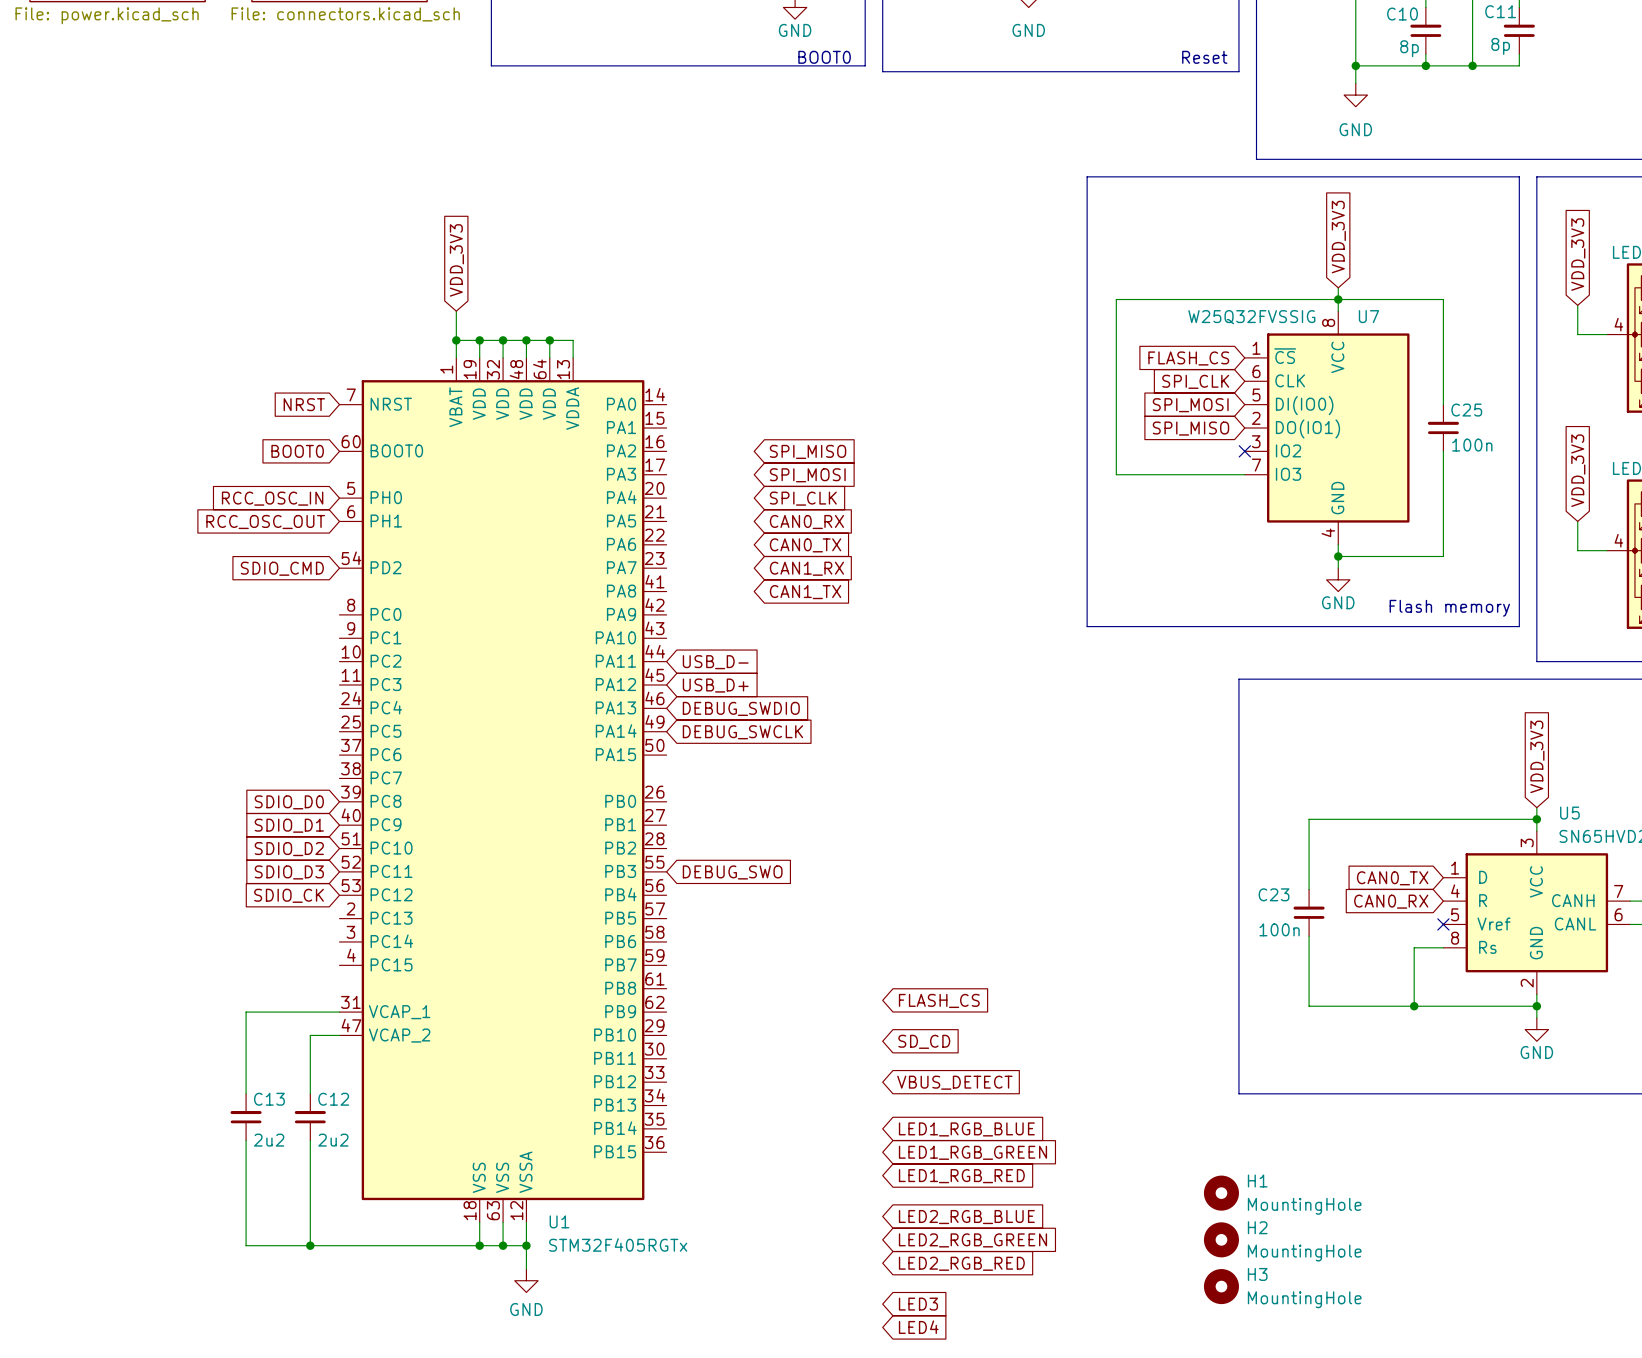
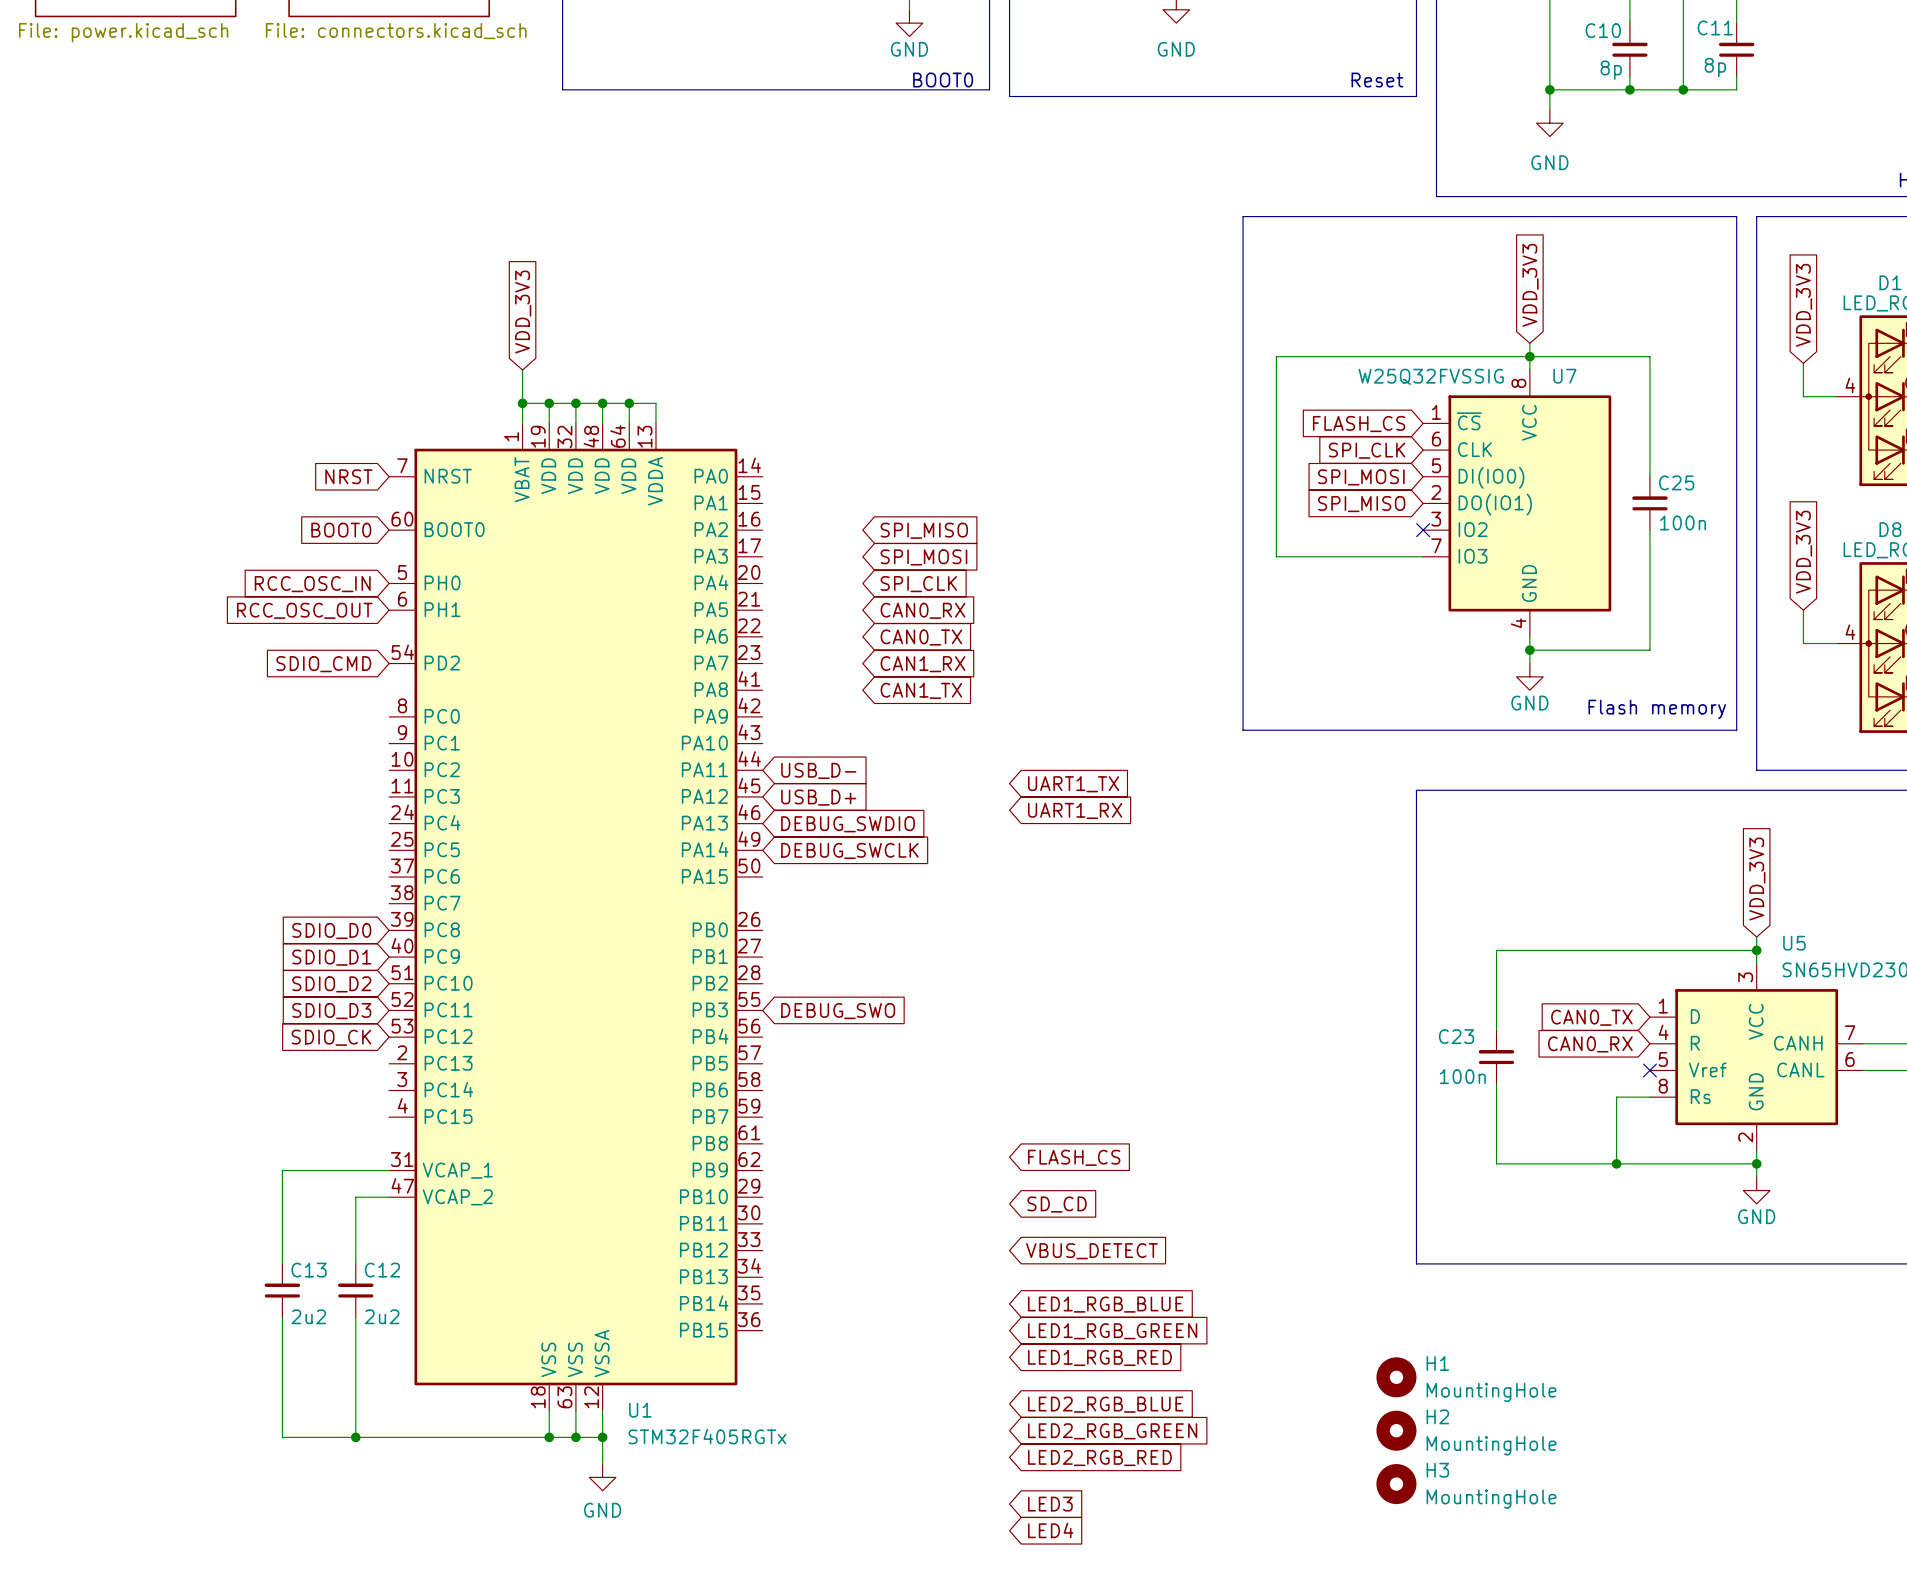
global label: none -> UART1_TX (1073, 784)
global label: none -> UART1_RX (1075, 810)

